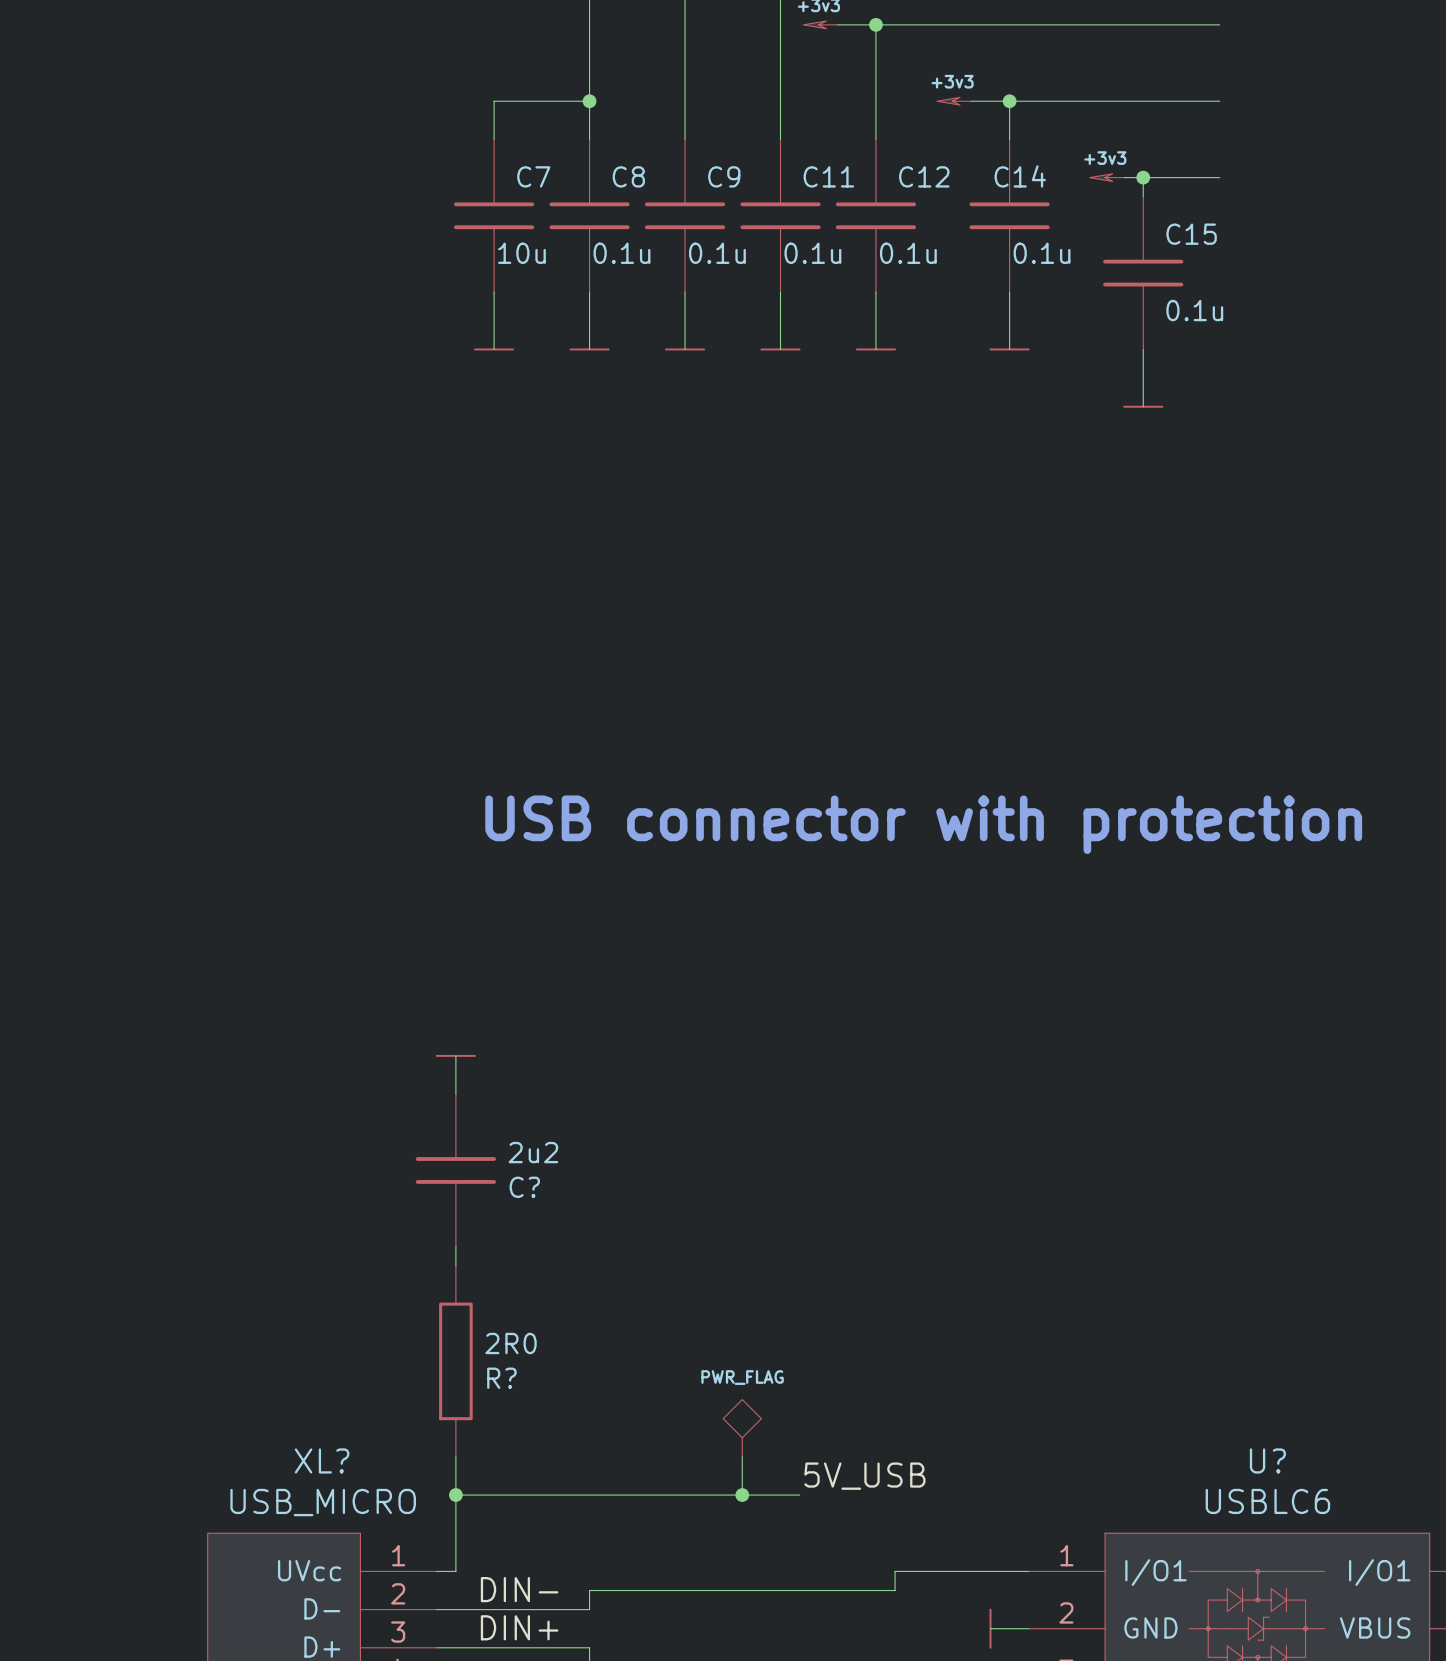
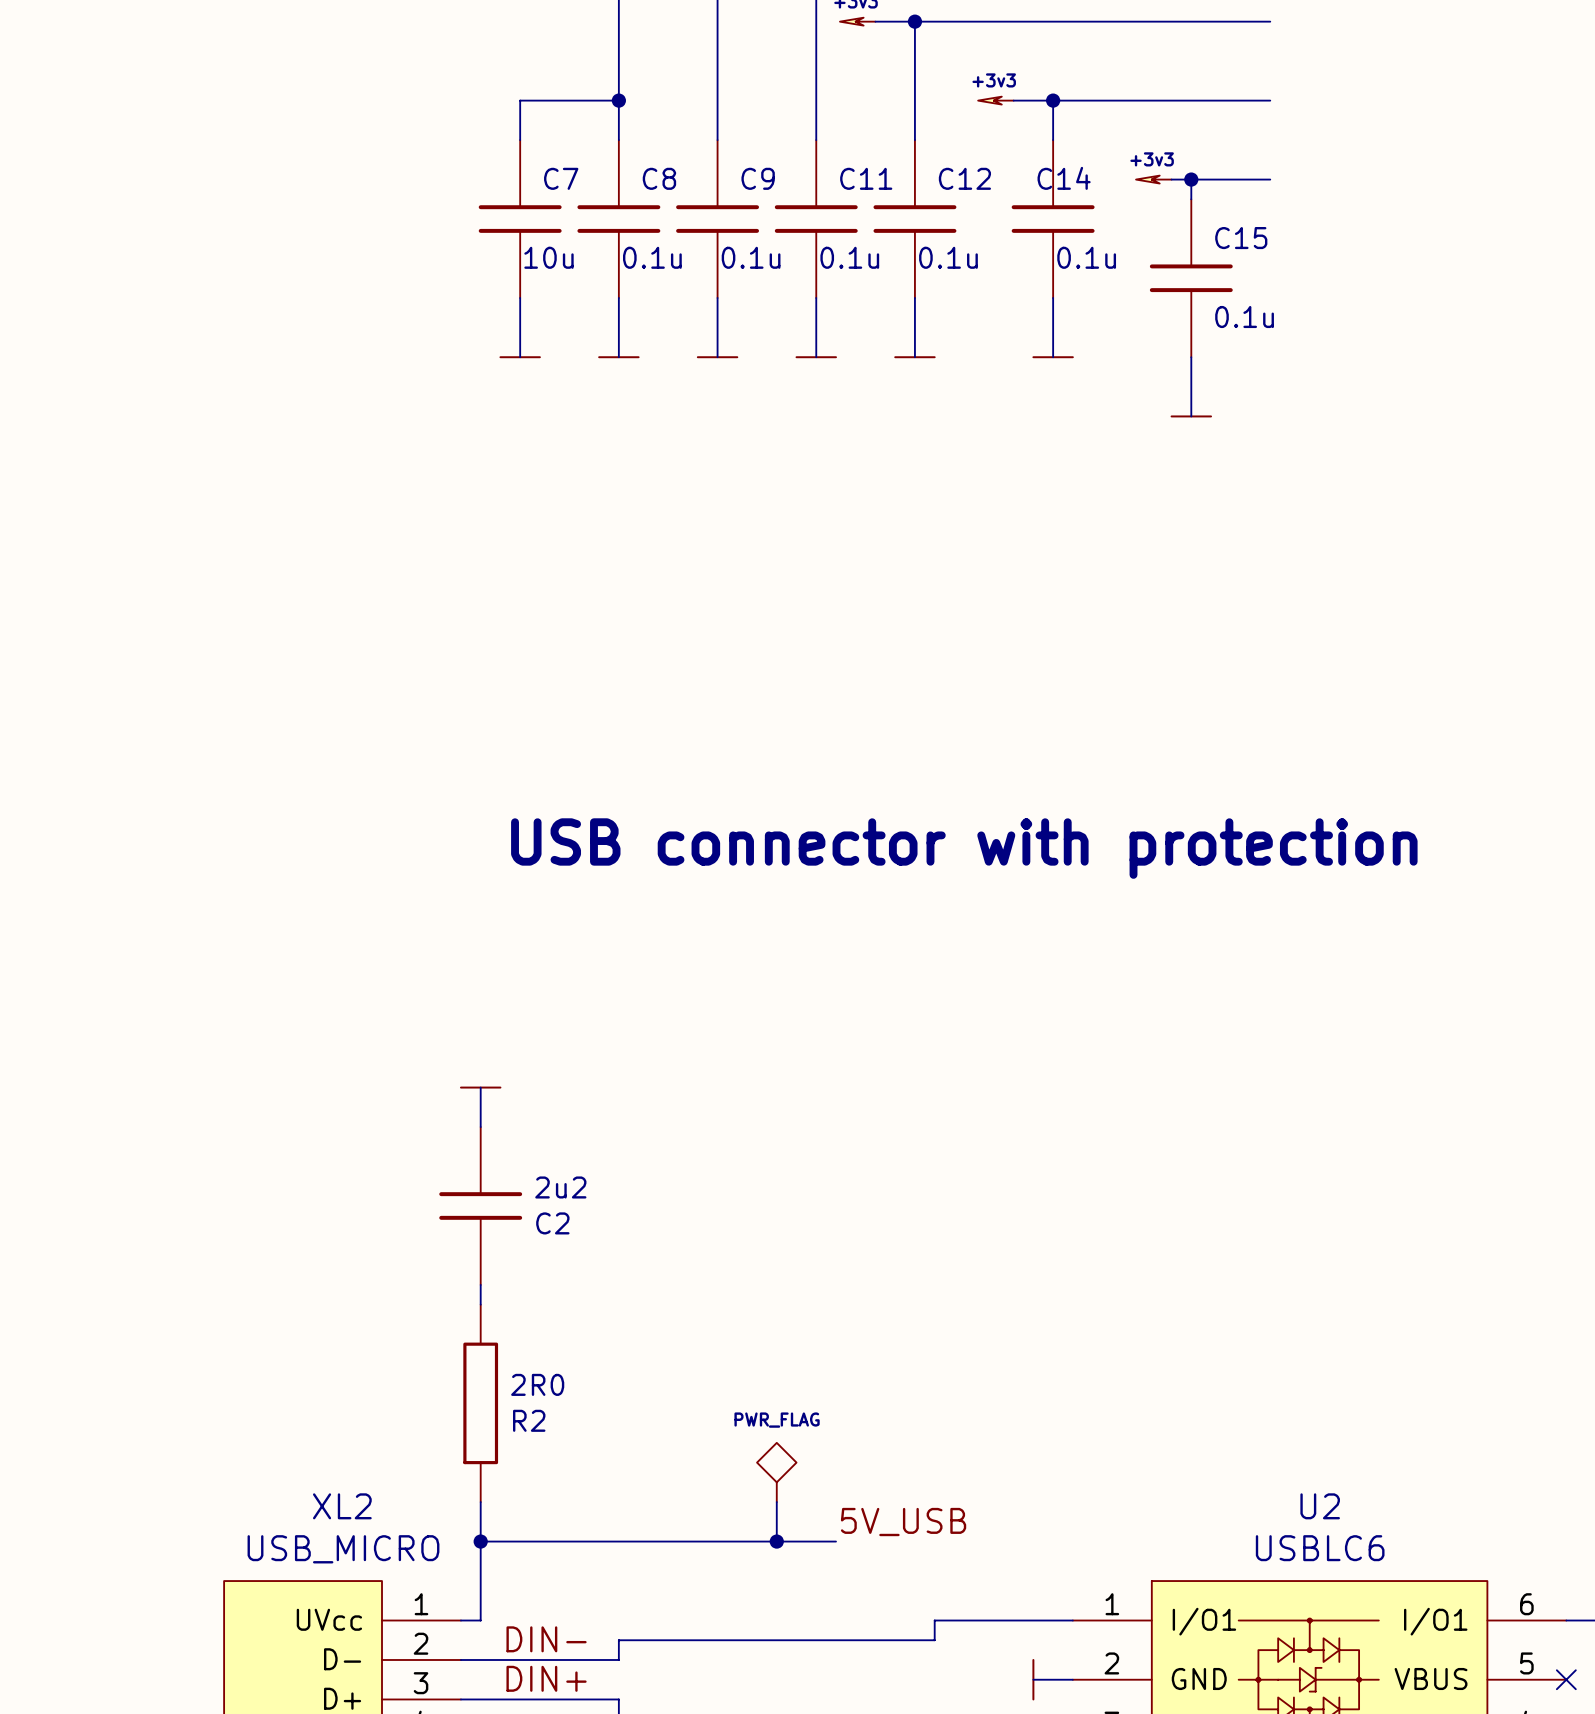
C? name: C? (524, 1187) -> C2 (552, 1223)
R? name: R? (501, 1378) -> R2 (529, 1420)
XL? name: XL? (322, 1460) -> XL2 (342, 1506)
U? name: U? (1267, 1460) -> U2 (1320, 1506)

